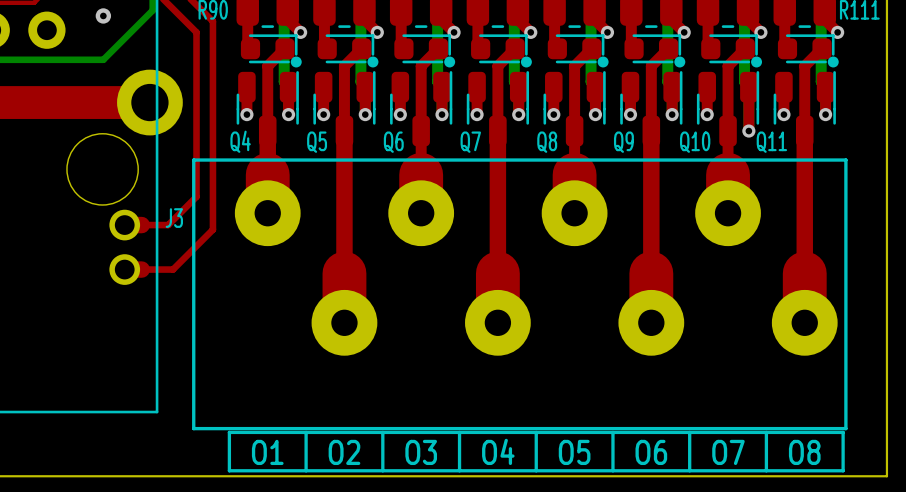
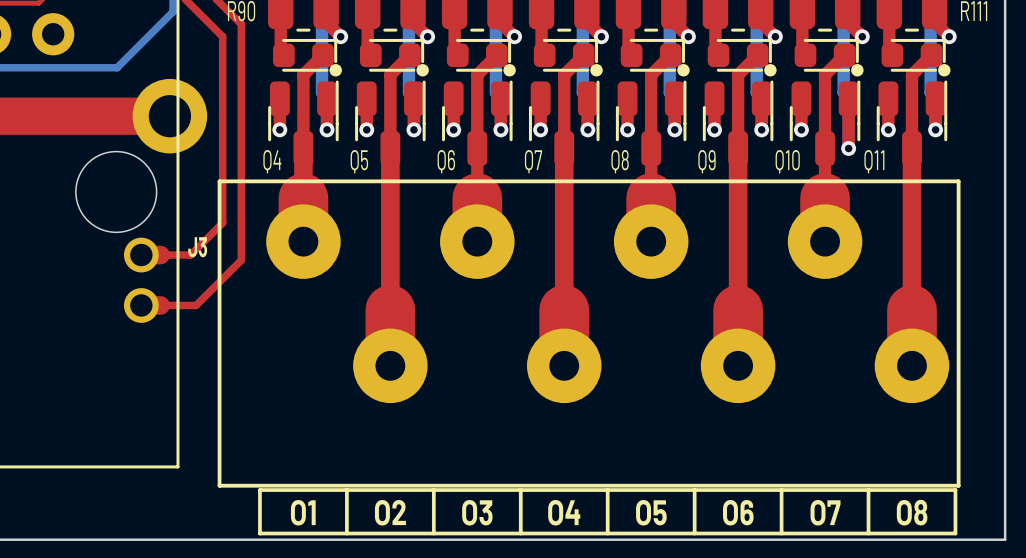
via: (103, 15) -> none

